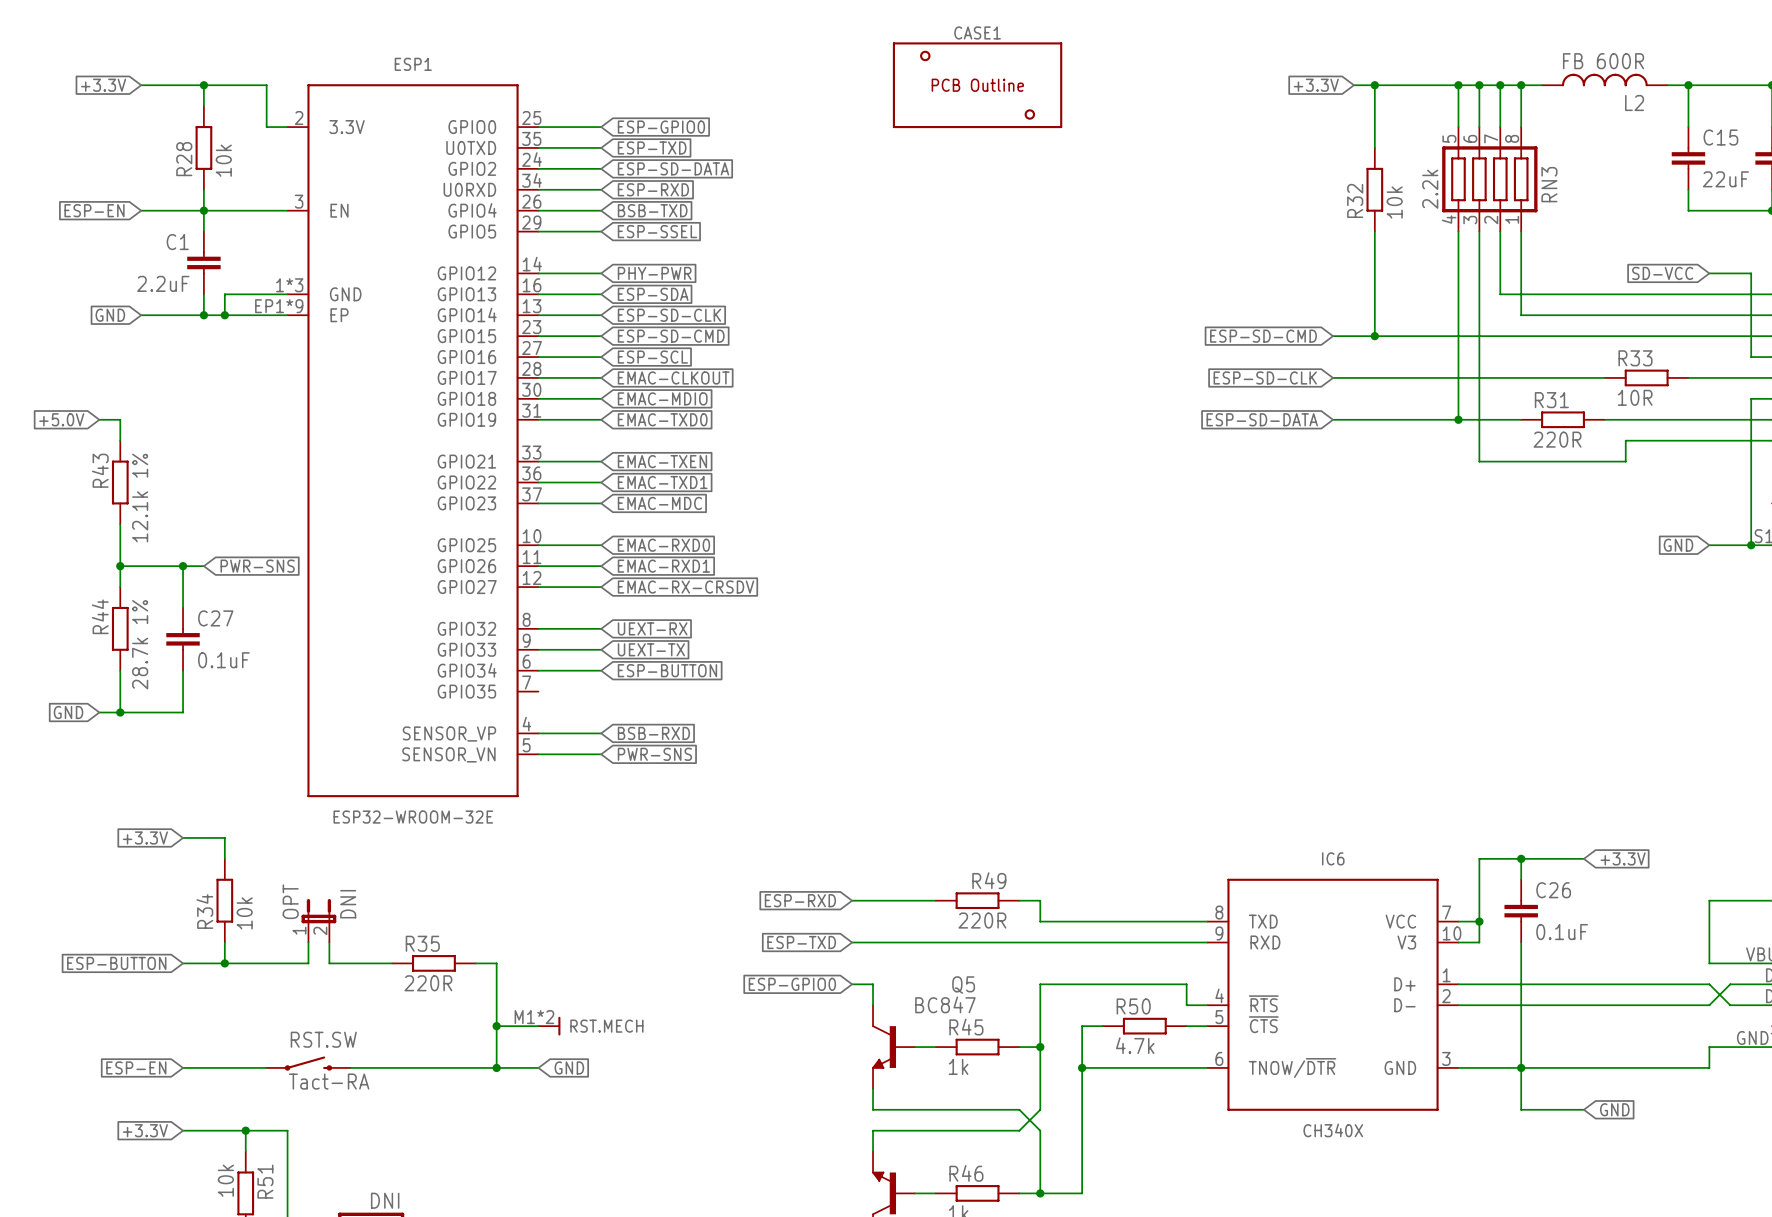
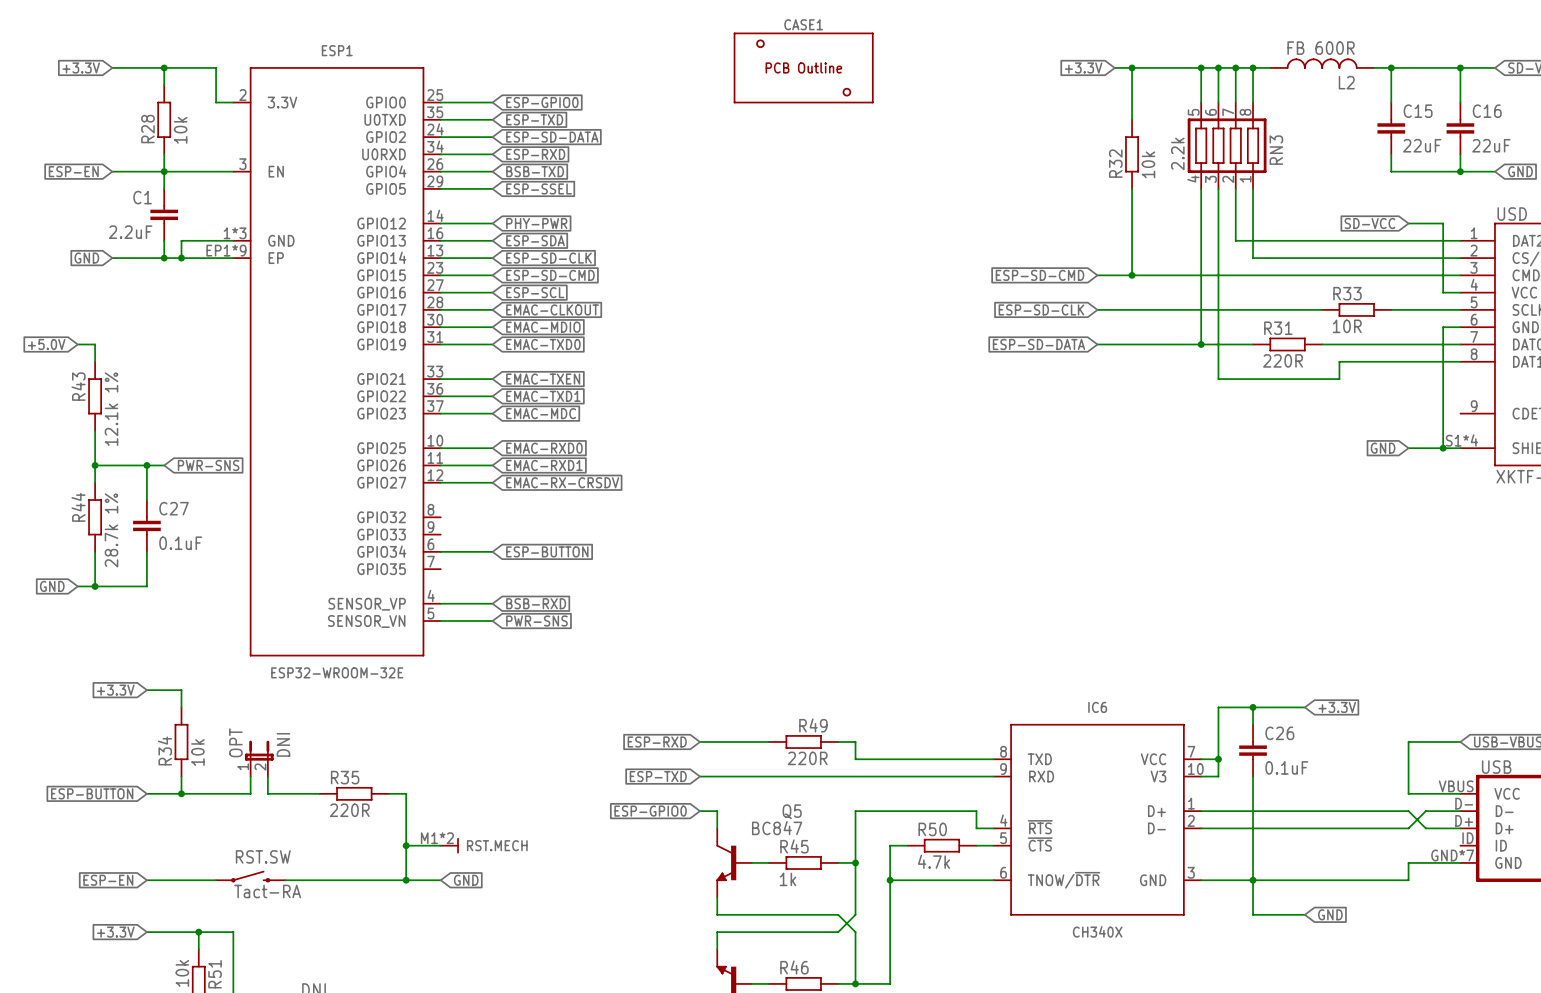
wire: (538, 628) (601, 628) -> none
global label: UEXT-RX (652, 628) -> none
wire: (538, 649) (601, 649) -> none
global label: UEXT-TX (651, 649) -> none

